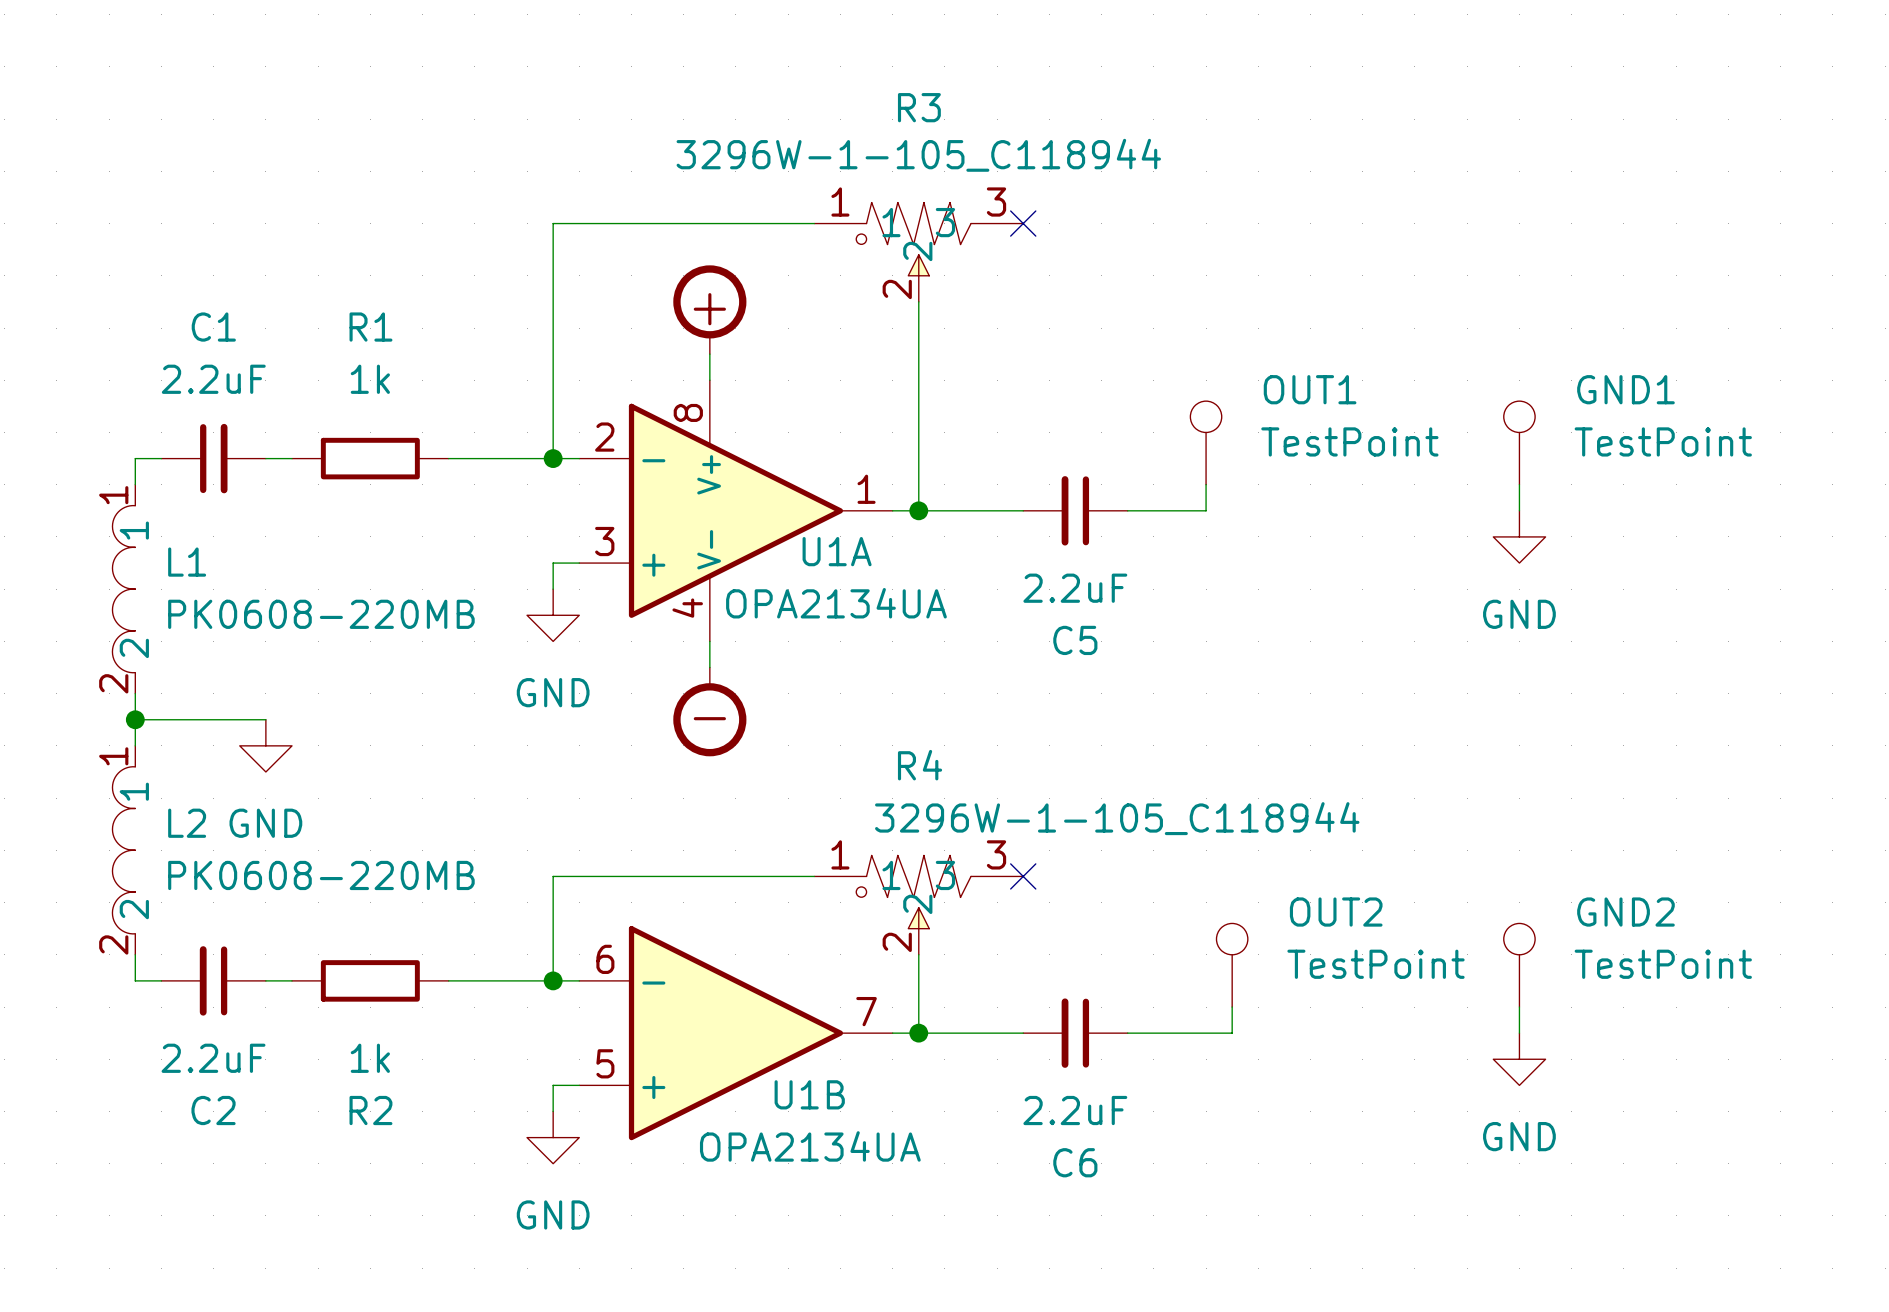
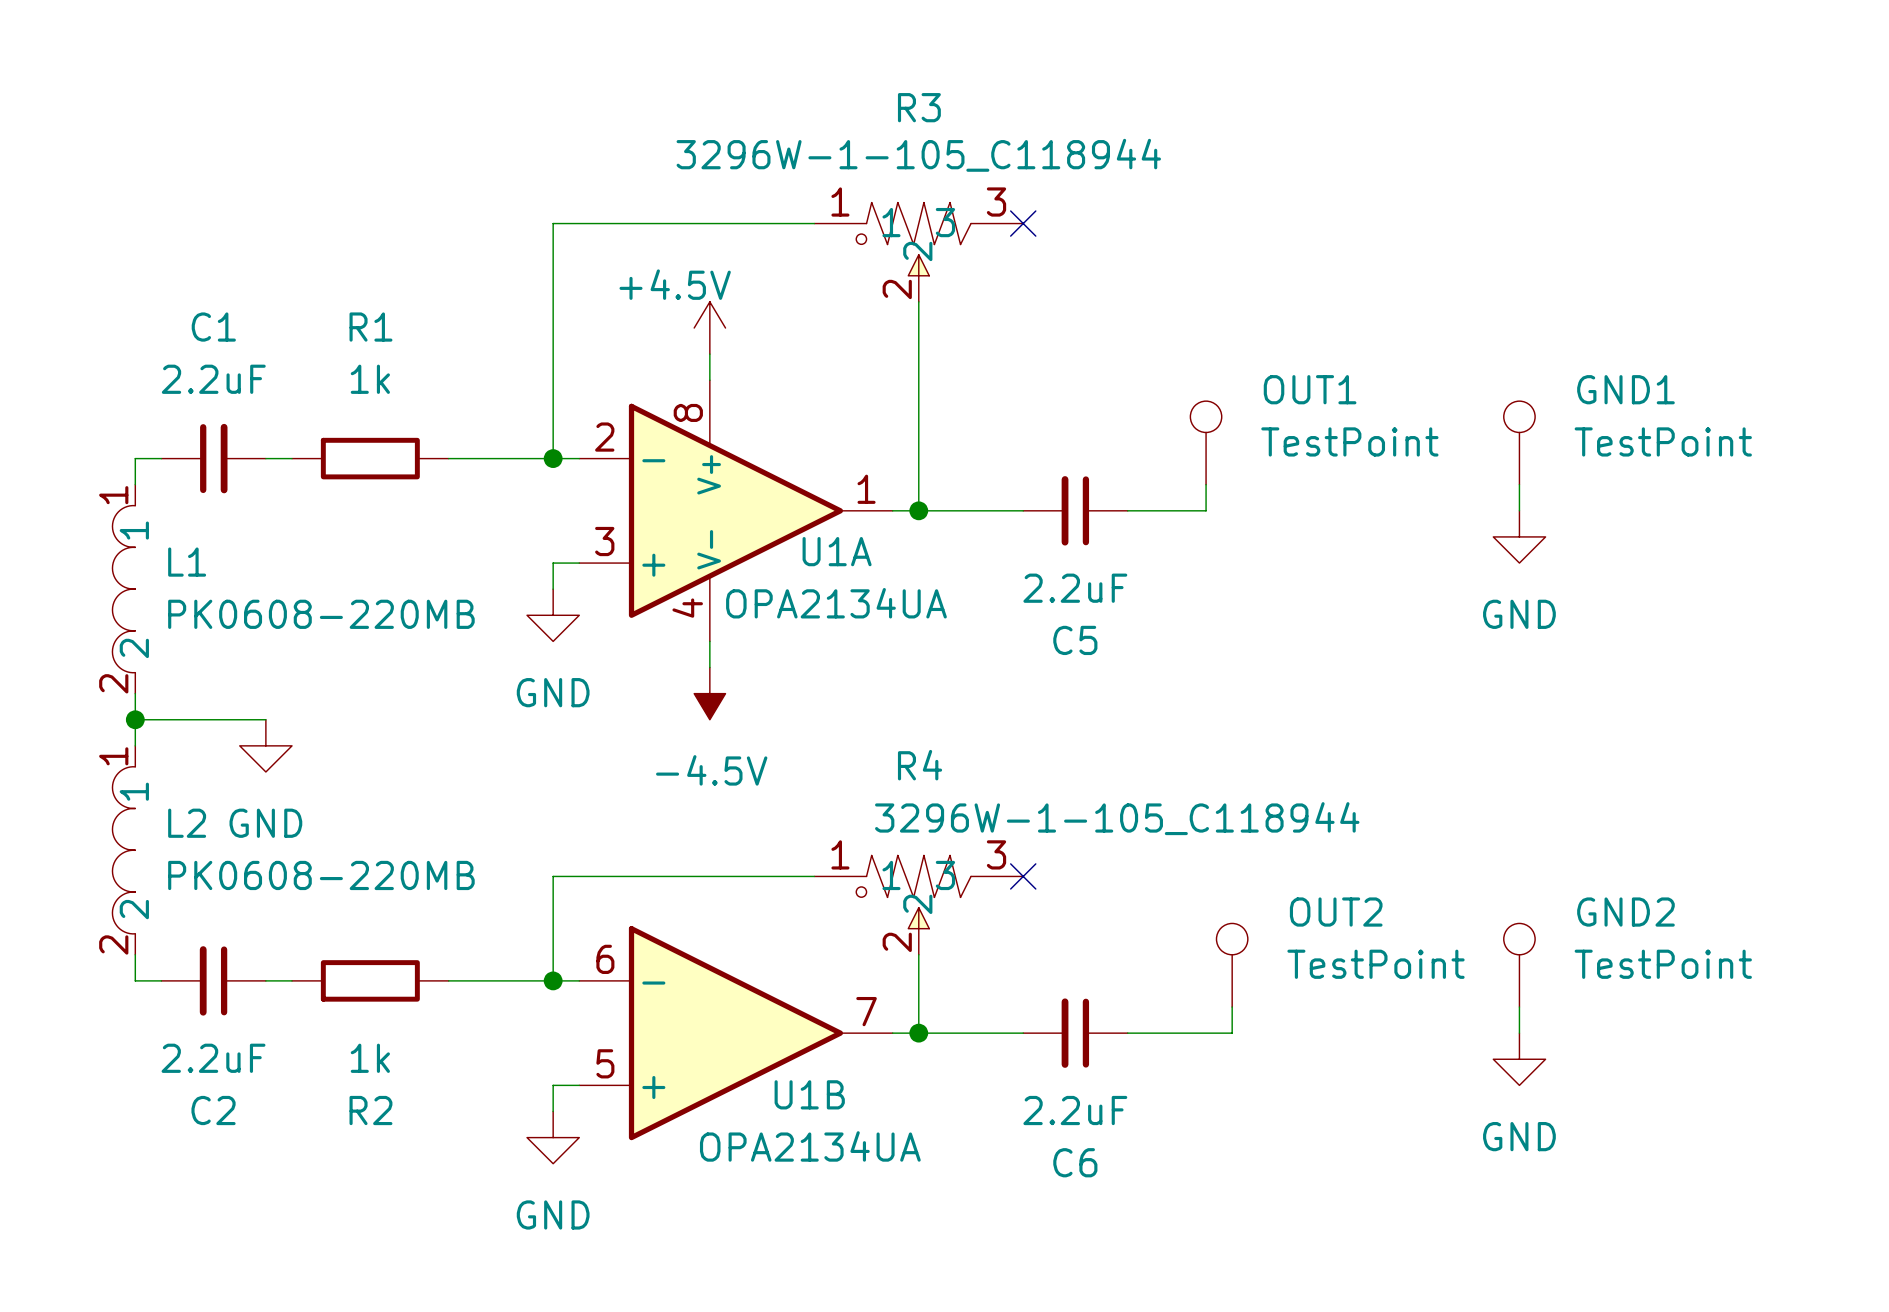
power symbol shape: [673, 265, 747, 355] -> [694, 301, 726, 355]
power symbol text: none -> +4.5V (675, 284)
power symbol shape: [673, 667, 747, 757] -> [694, 667, 726, 720]
power symbol text: none -> -4.5V (711, 770)

